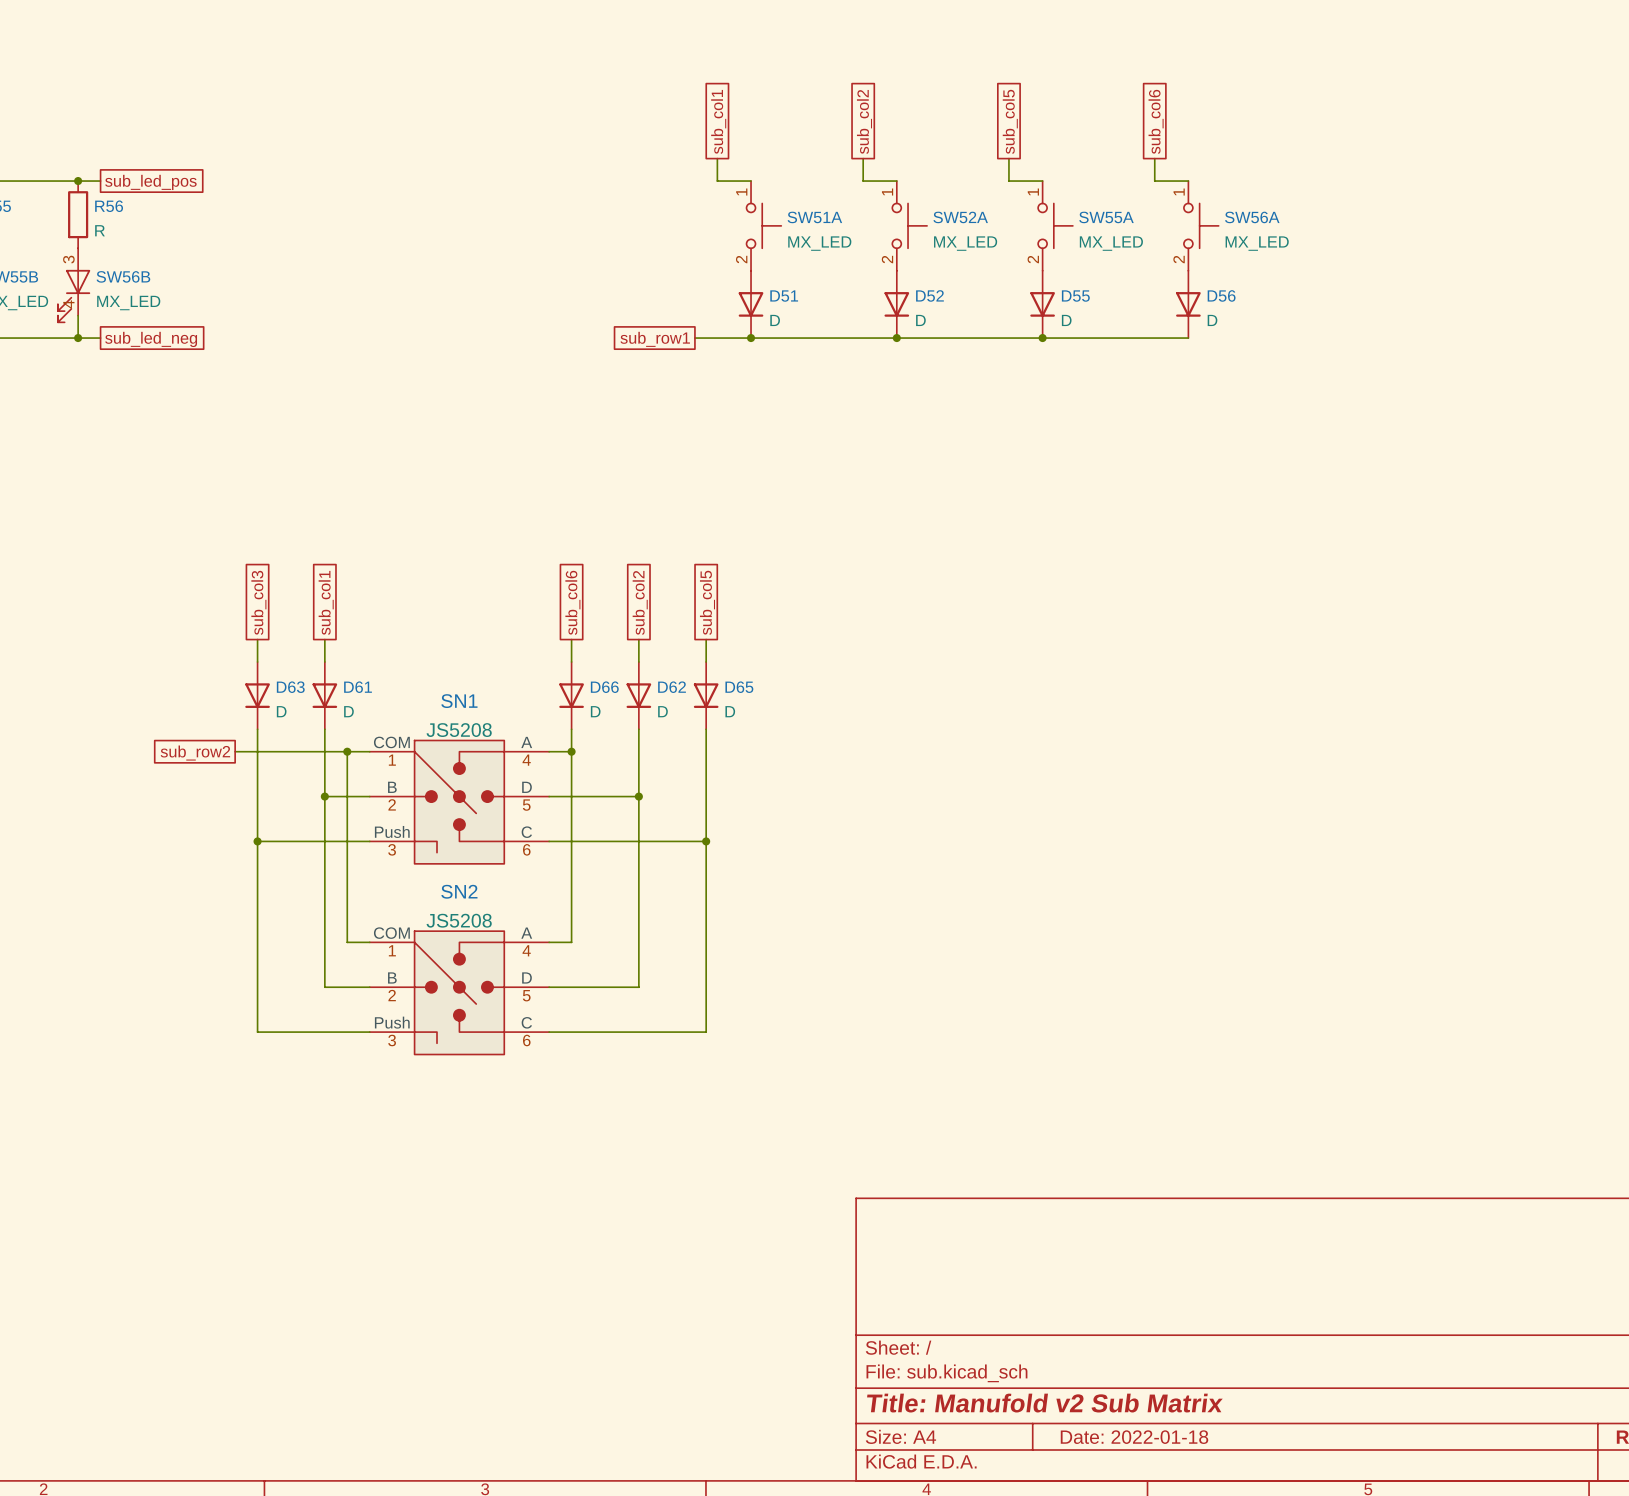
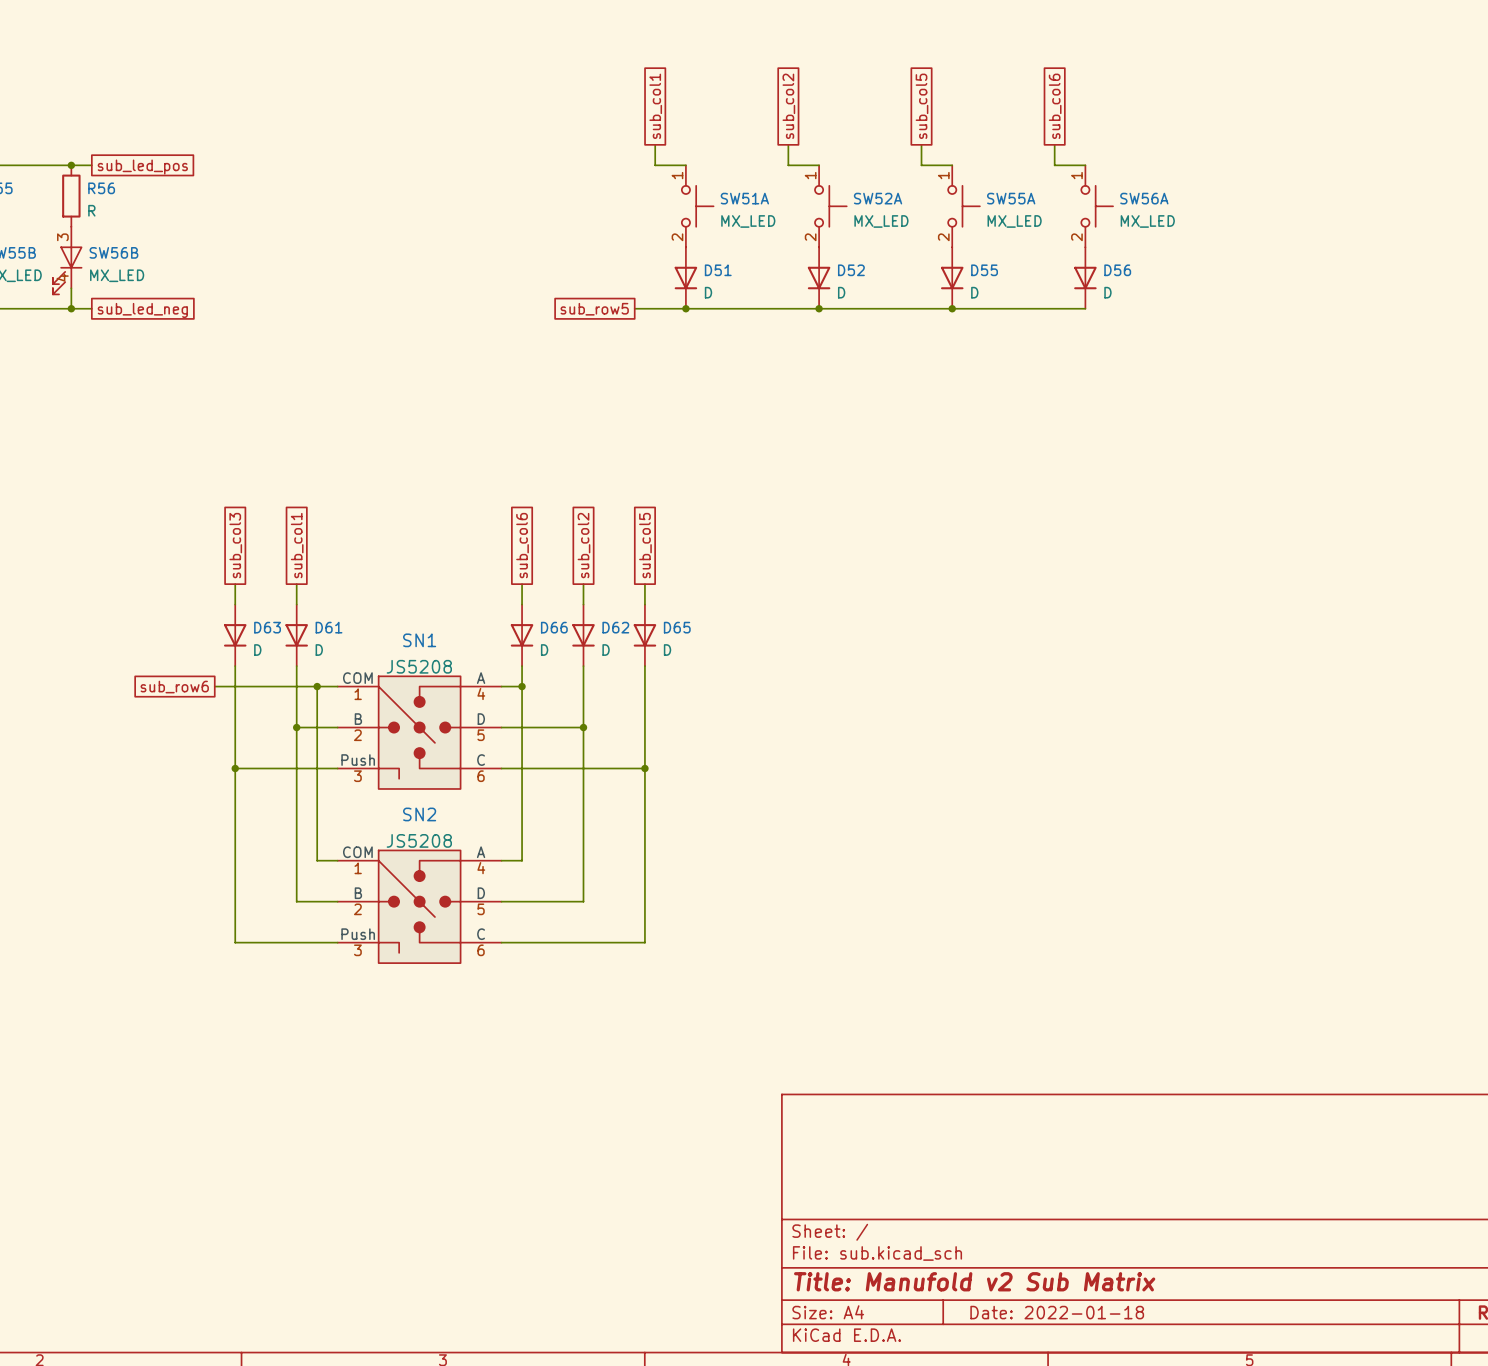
global label: sub_row1 (655, 339) -> sub_row5 (594, 309)
global label: sub_row2 (195, 753) -> sub_row6 (174, 687)

